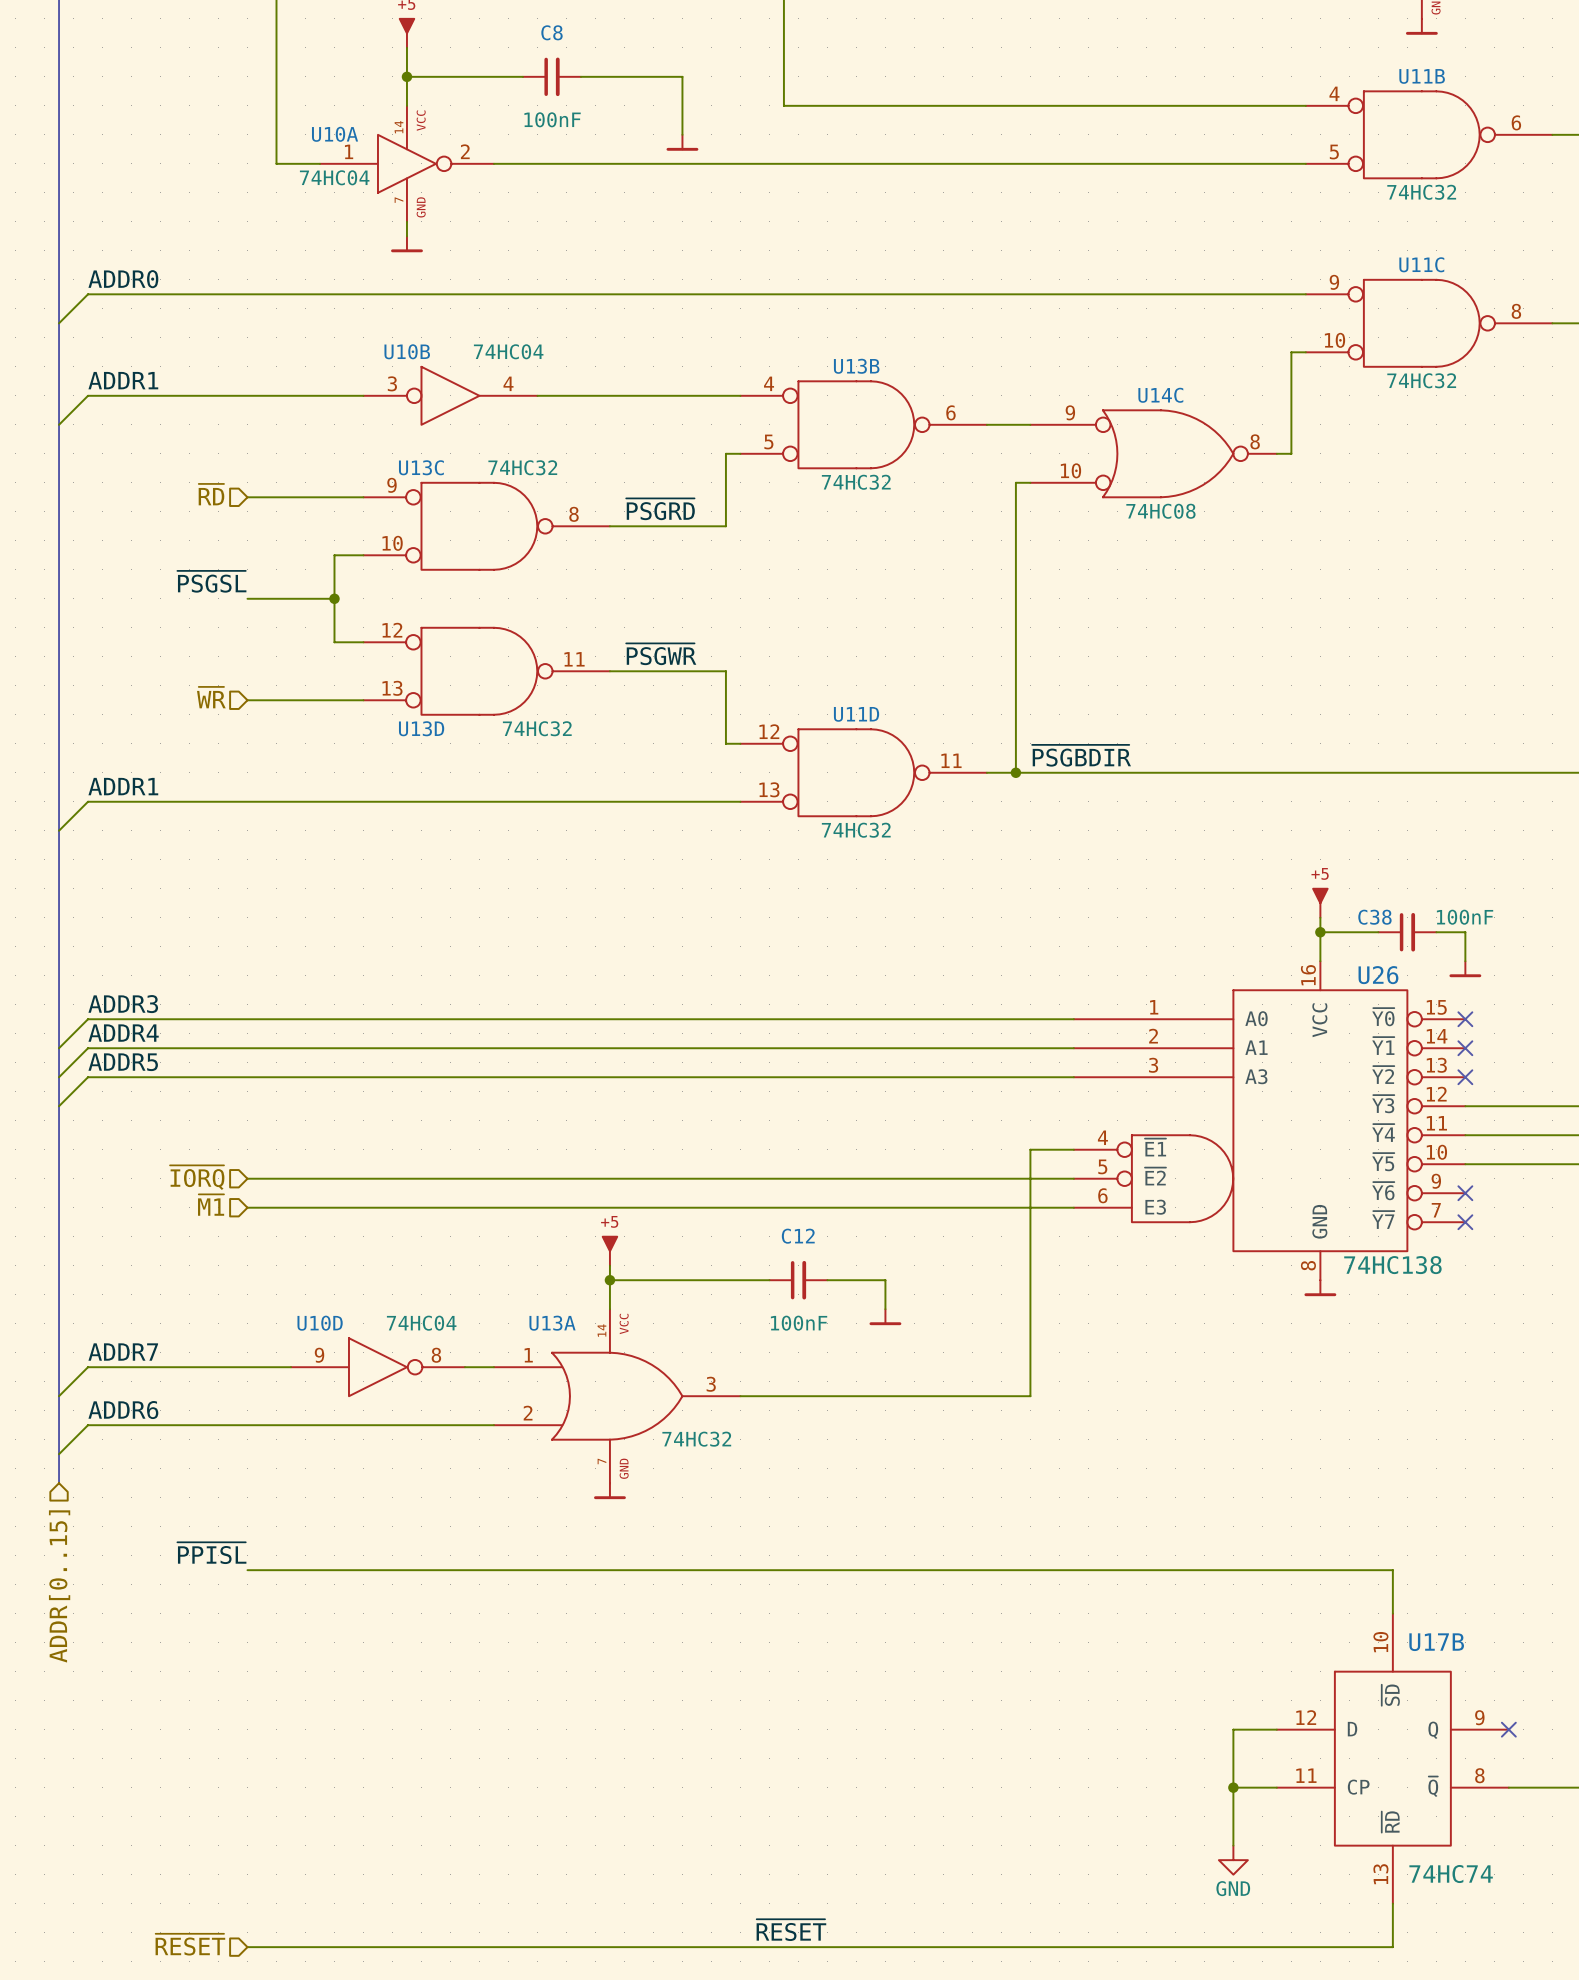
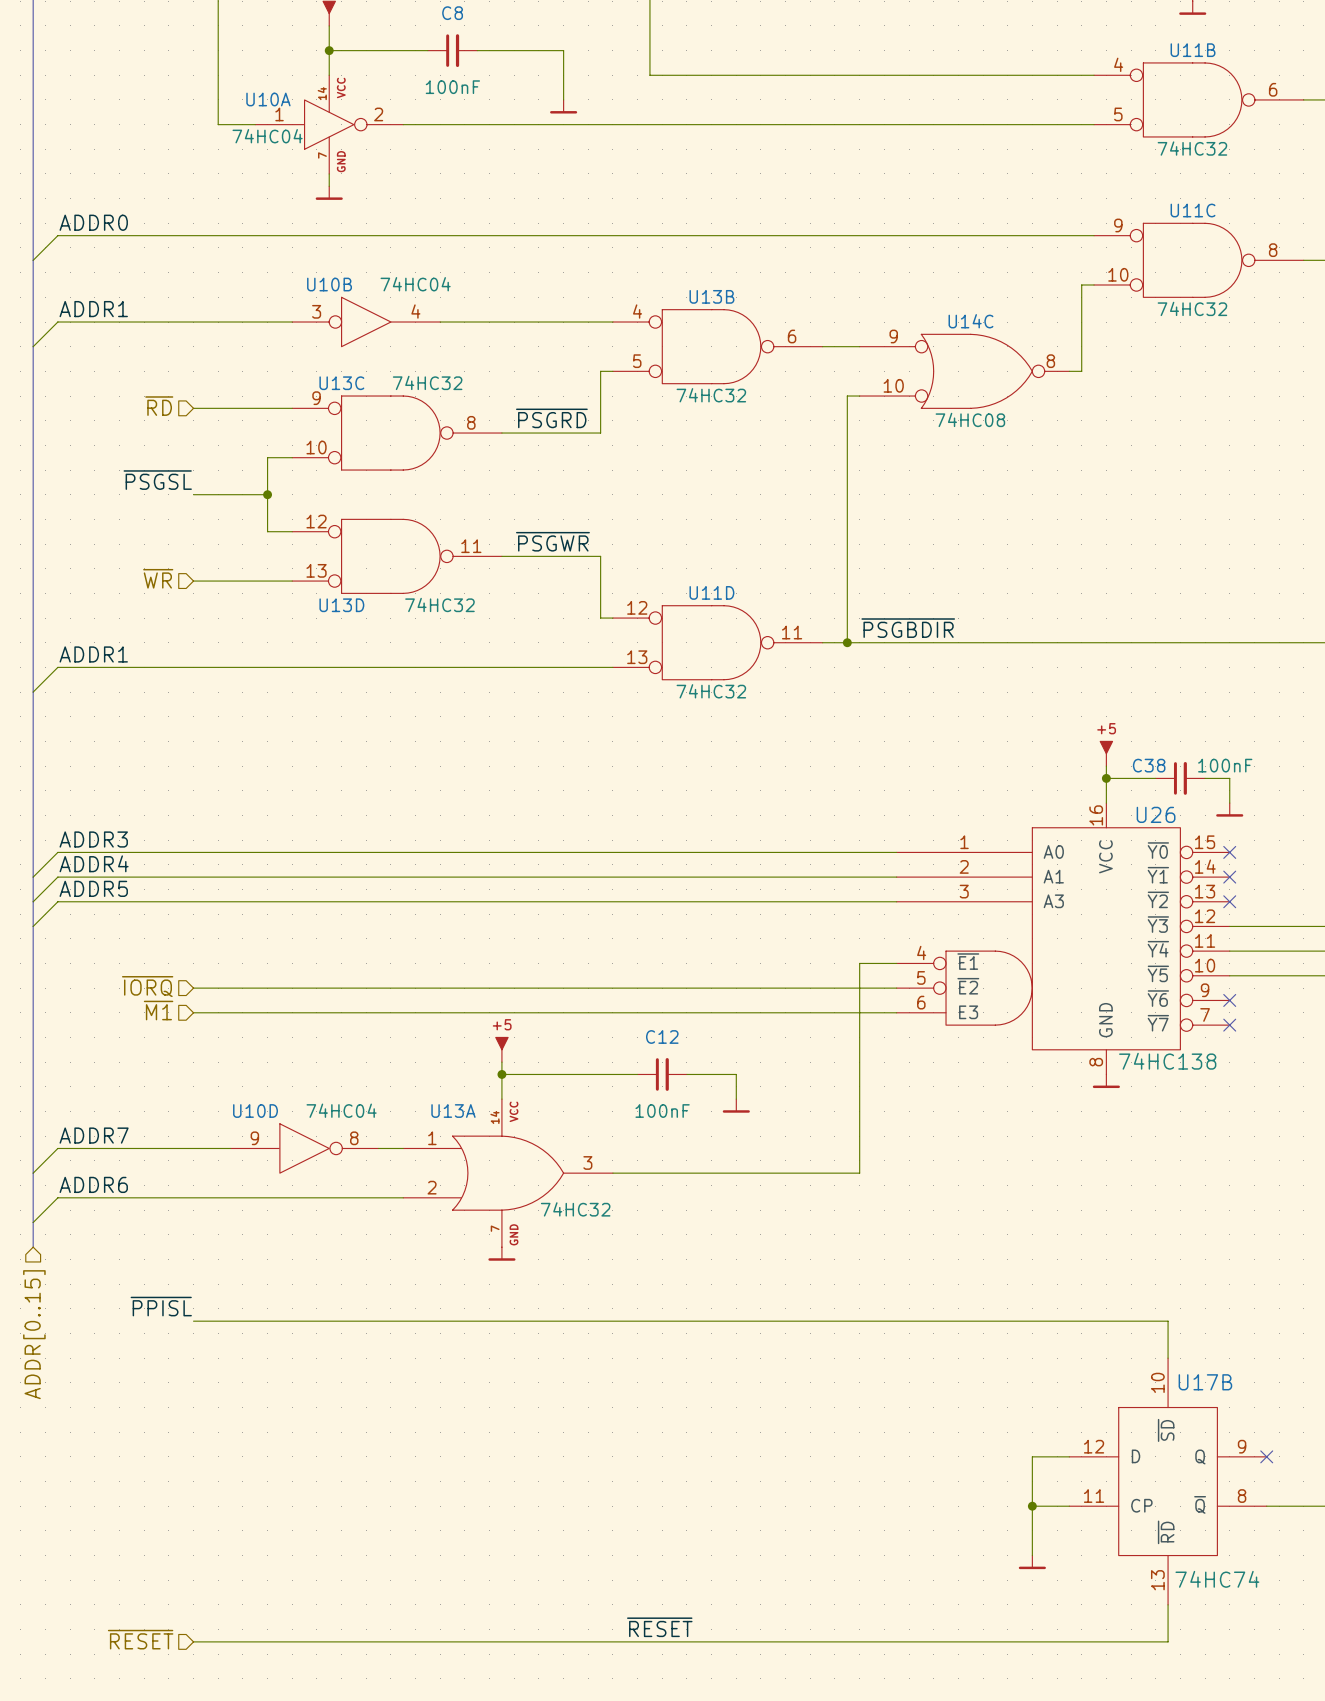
power symbol shape: [1218, 1845, 1248, 1875] -> [1018, 1555, 1046, 1570]
power symbol text: GND (1233, 1888) -> none

